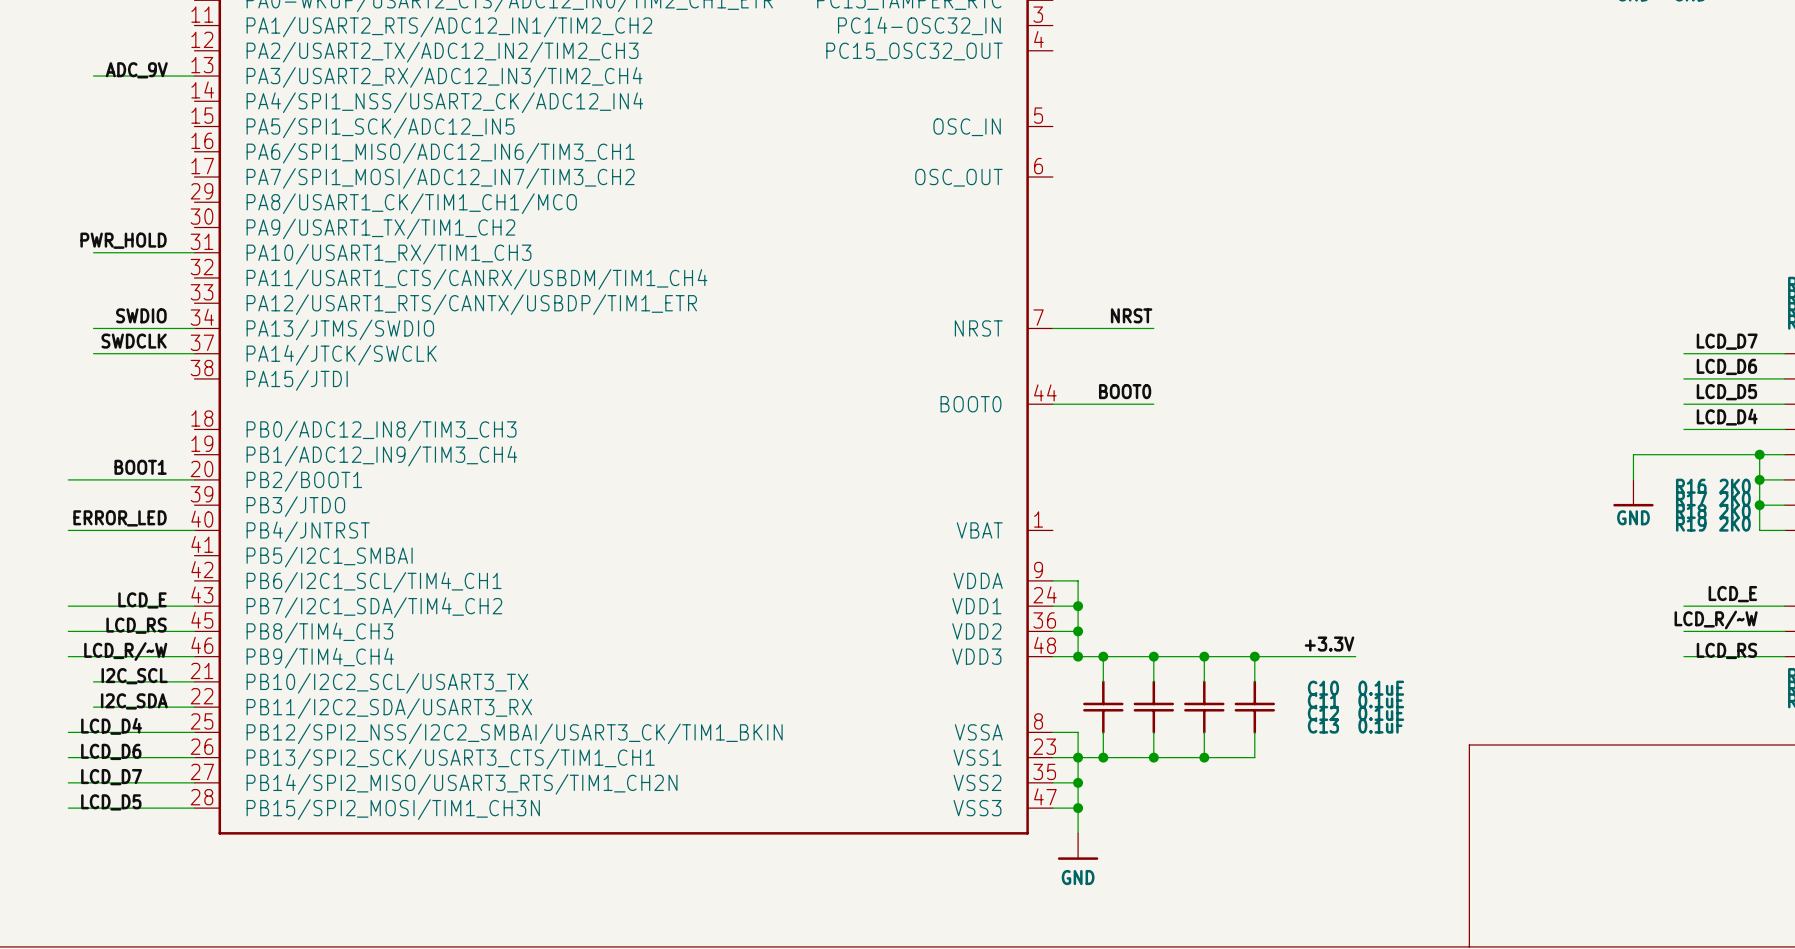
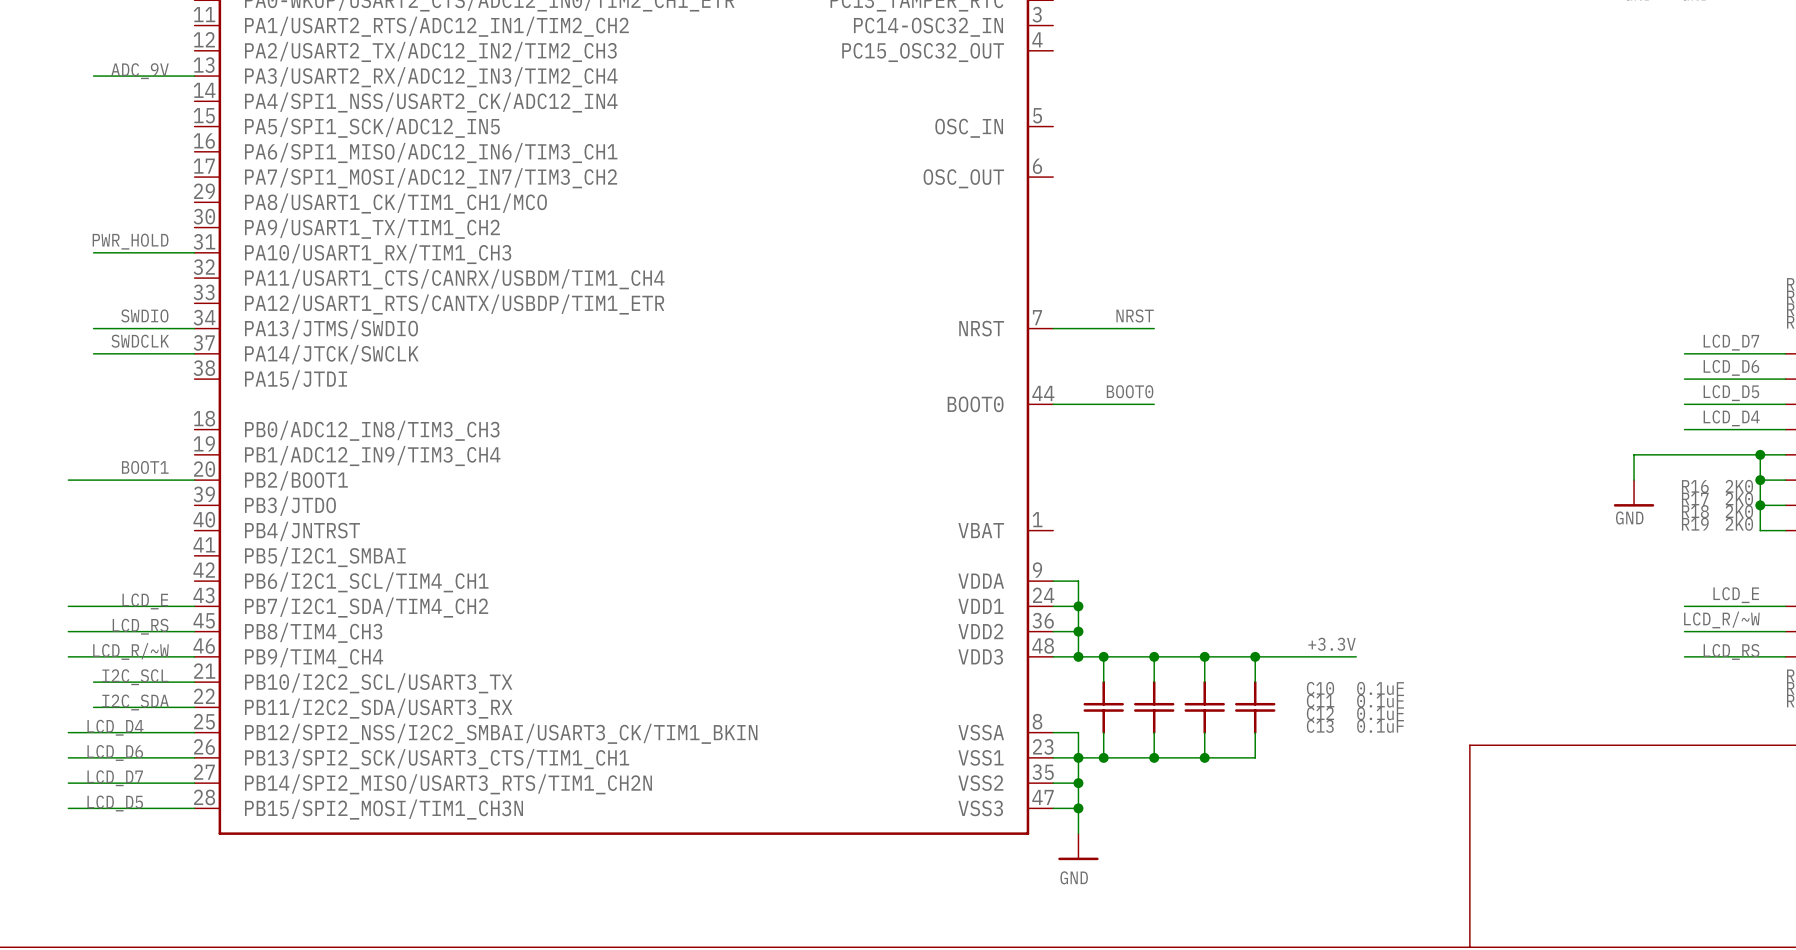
label: ERROR_LED (120, 518) -> none
wire: (68, 530) (194, 530) -> none

